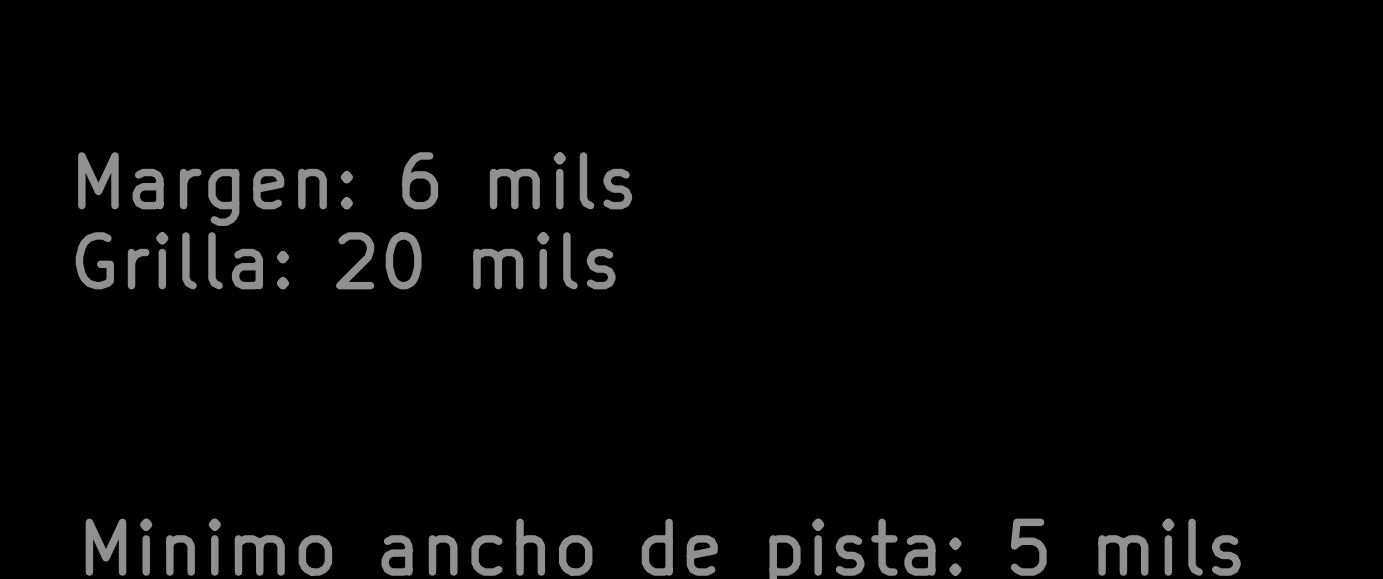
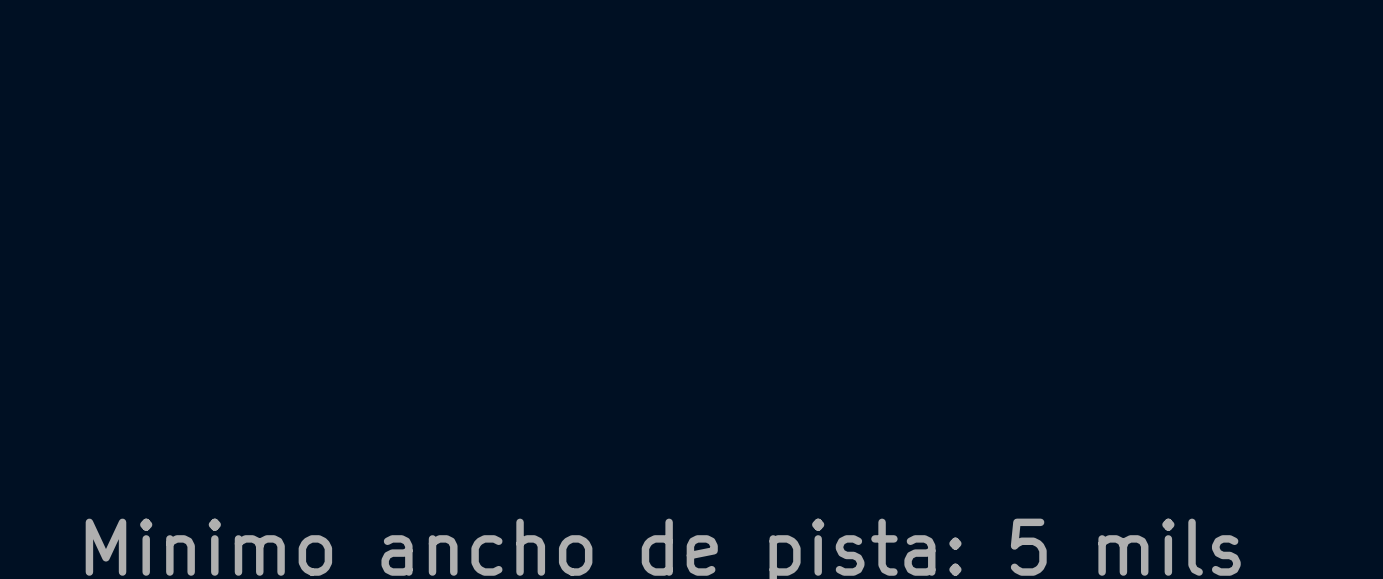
text: Margen: 6 mils (355, 189) -> none
text: Grilla: 20 mils (345, 260) -> none

